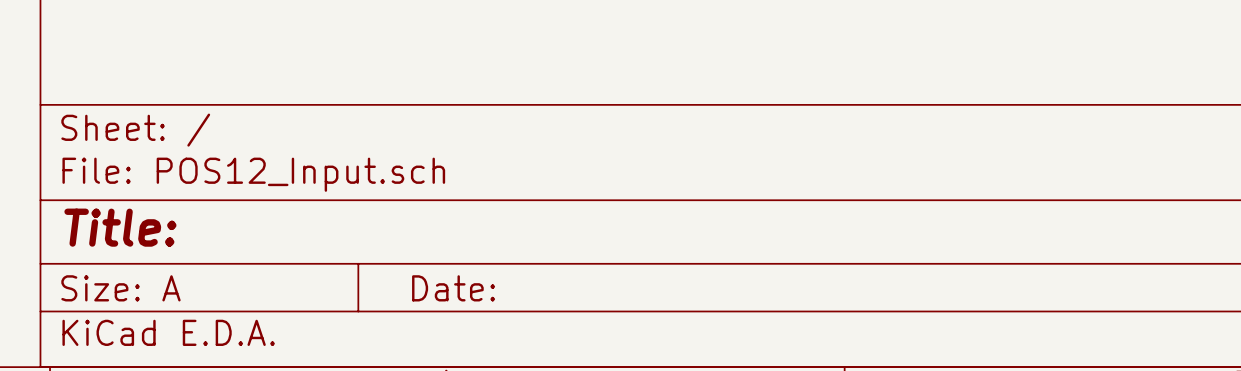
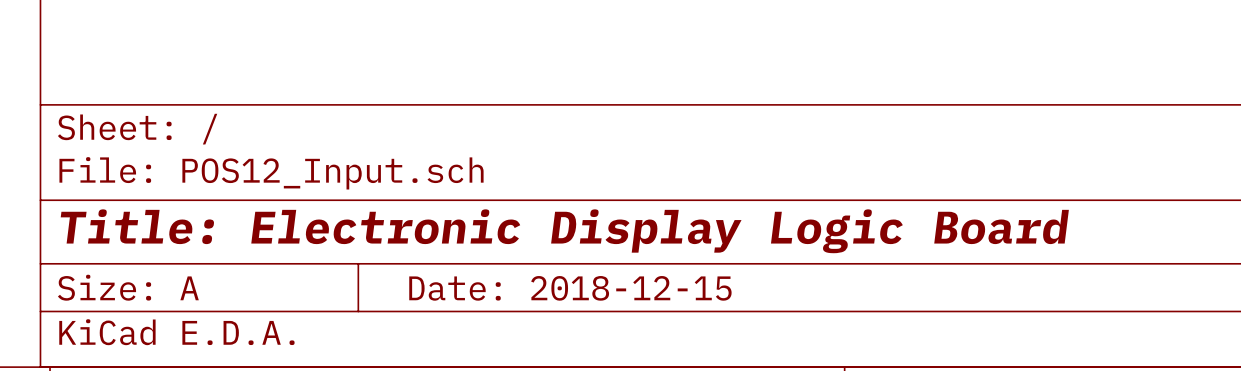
title block: Title: (120, 227) -> Title: Electronic Display Logic Board (564, 231)
title block: Date: (453, 288) -> Date: 2018-12-15 (570, 288)

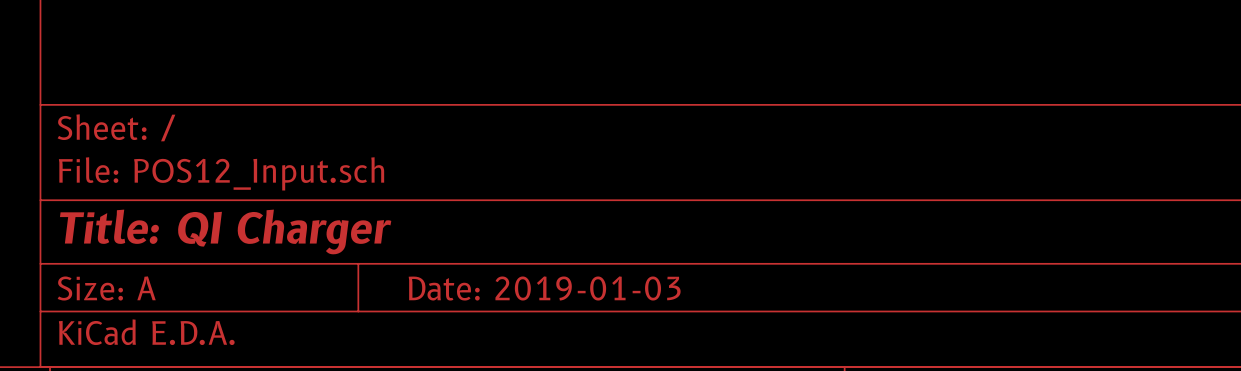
title block: Title: Electronic Display Logic Board (564, 231) -> Title: QI Charger (225, 231)
title block: Date: 2018-12-15 (570, 288) -> Date: 2019-01-03 (544, 288)

